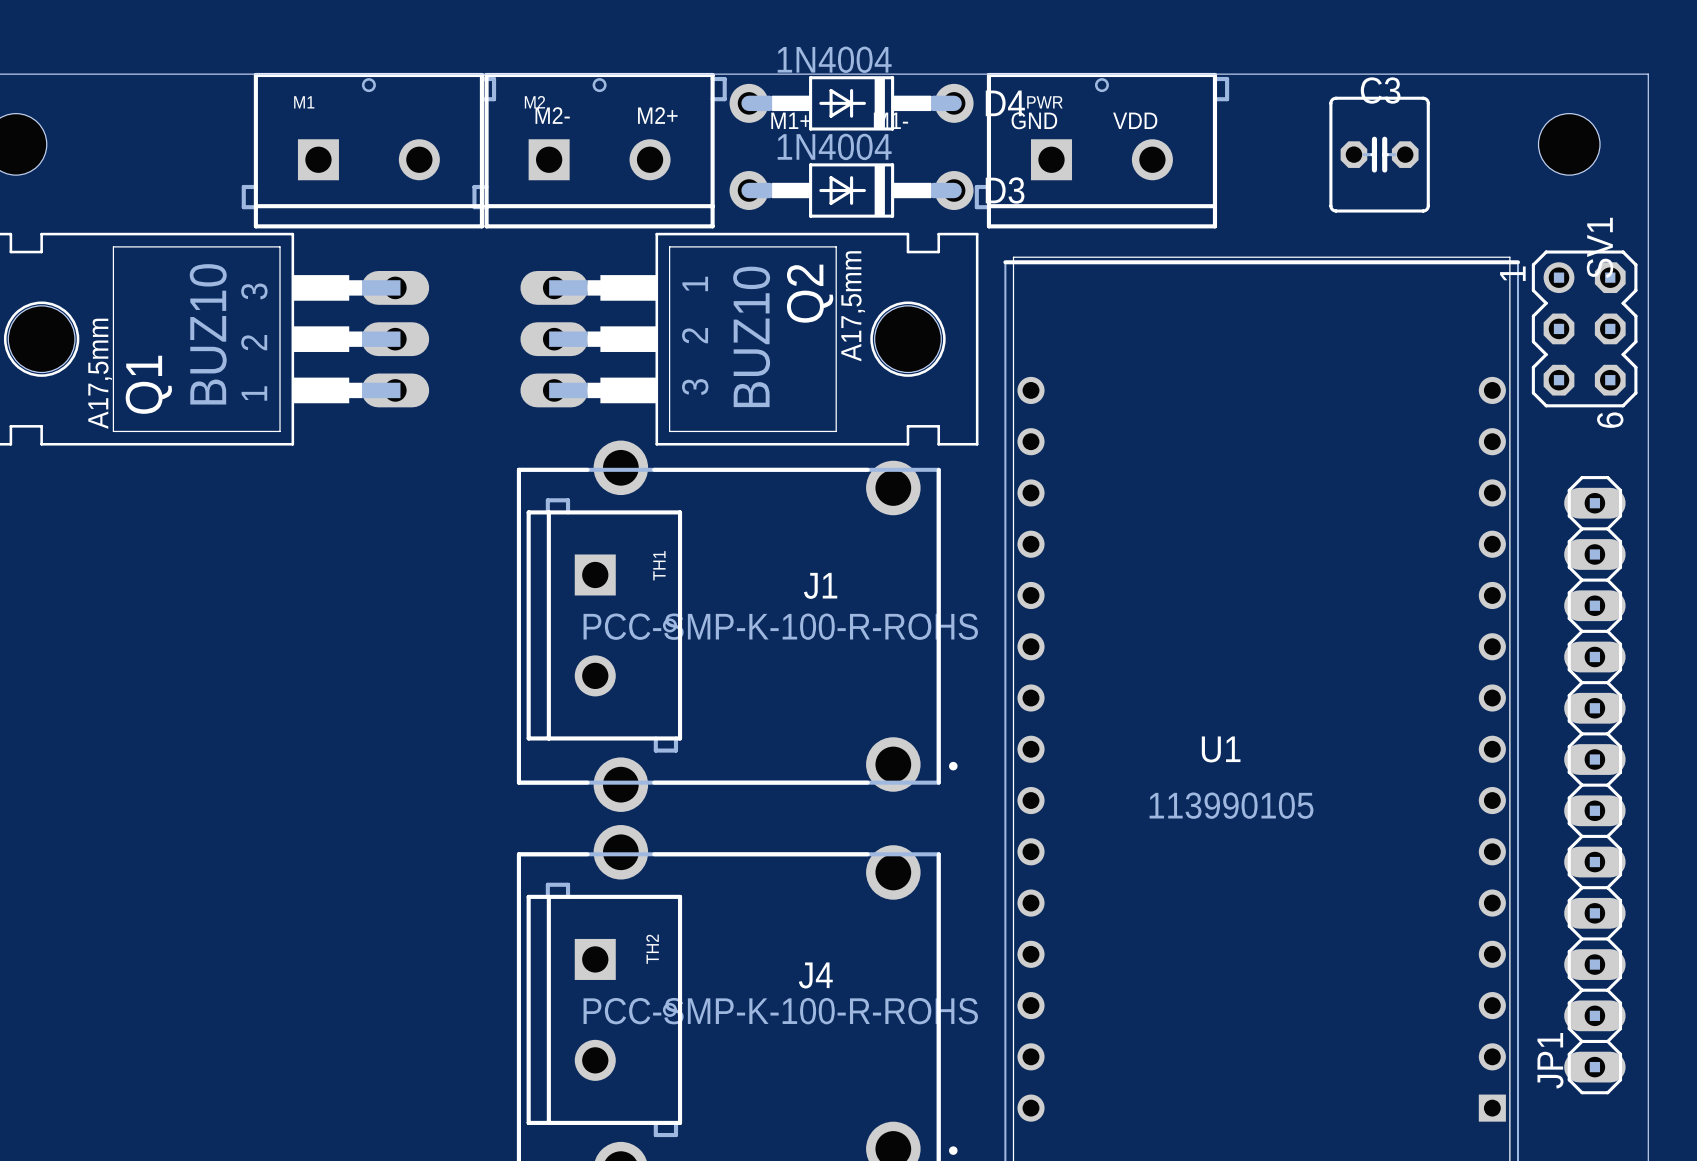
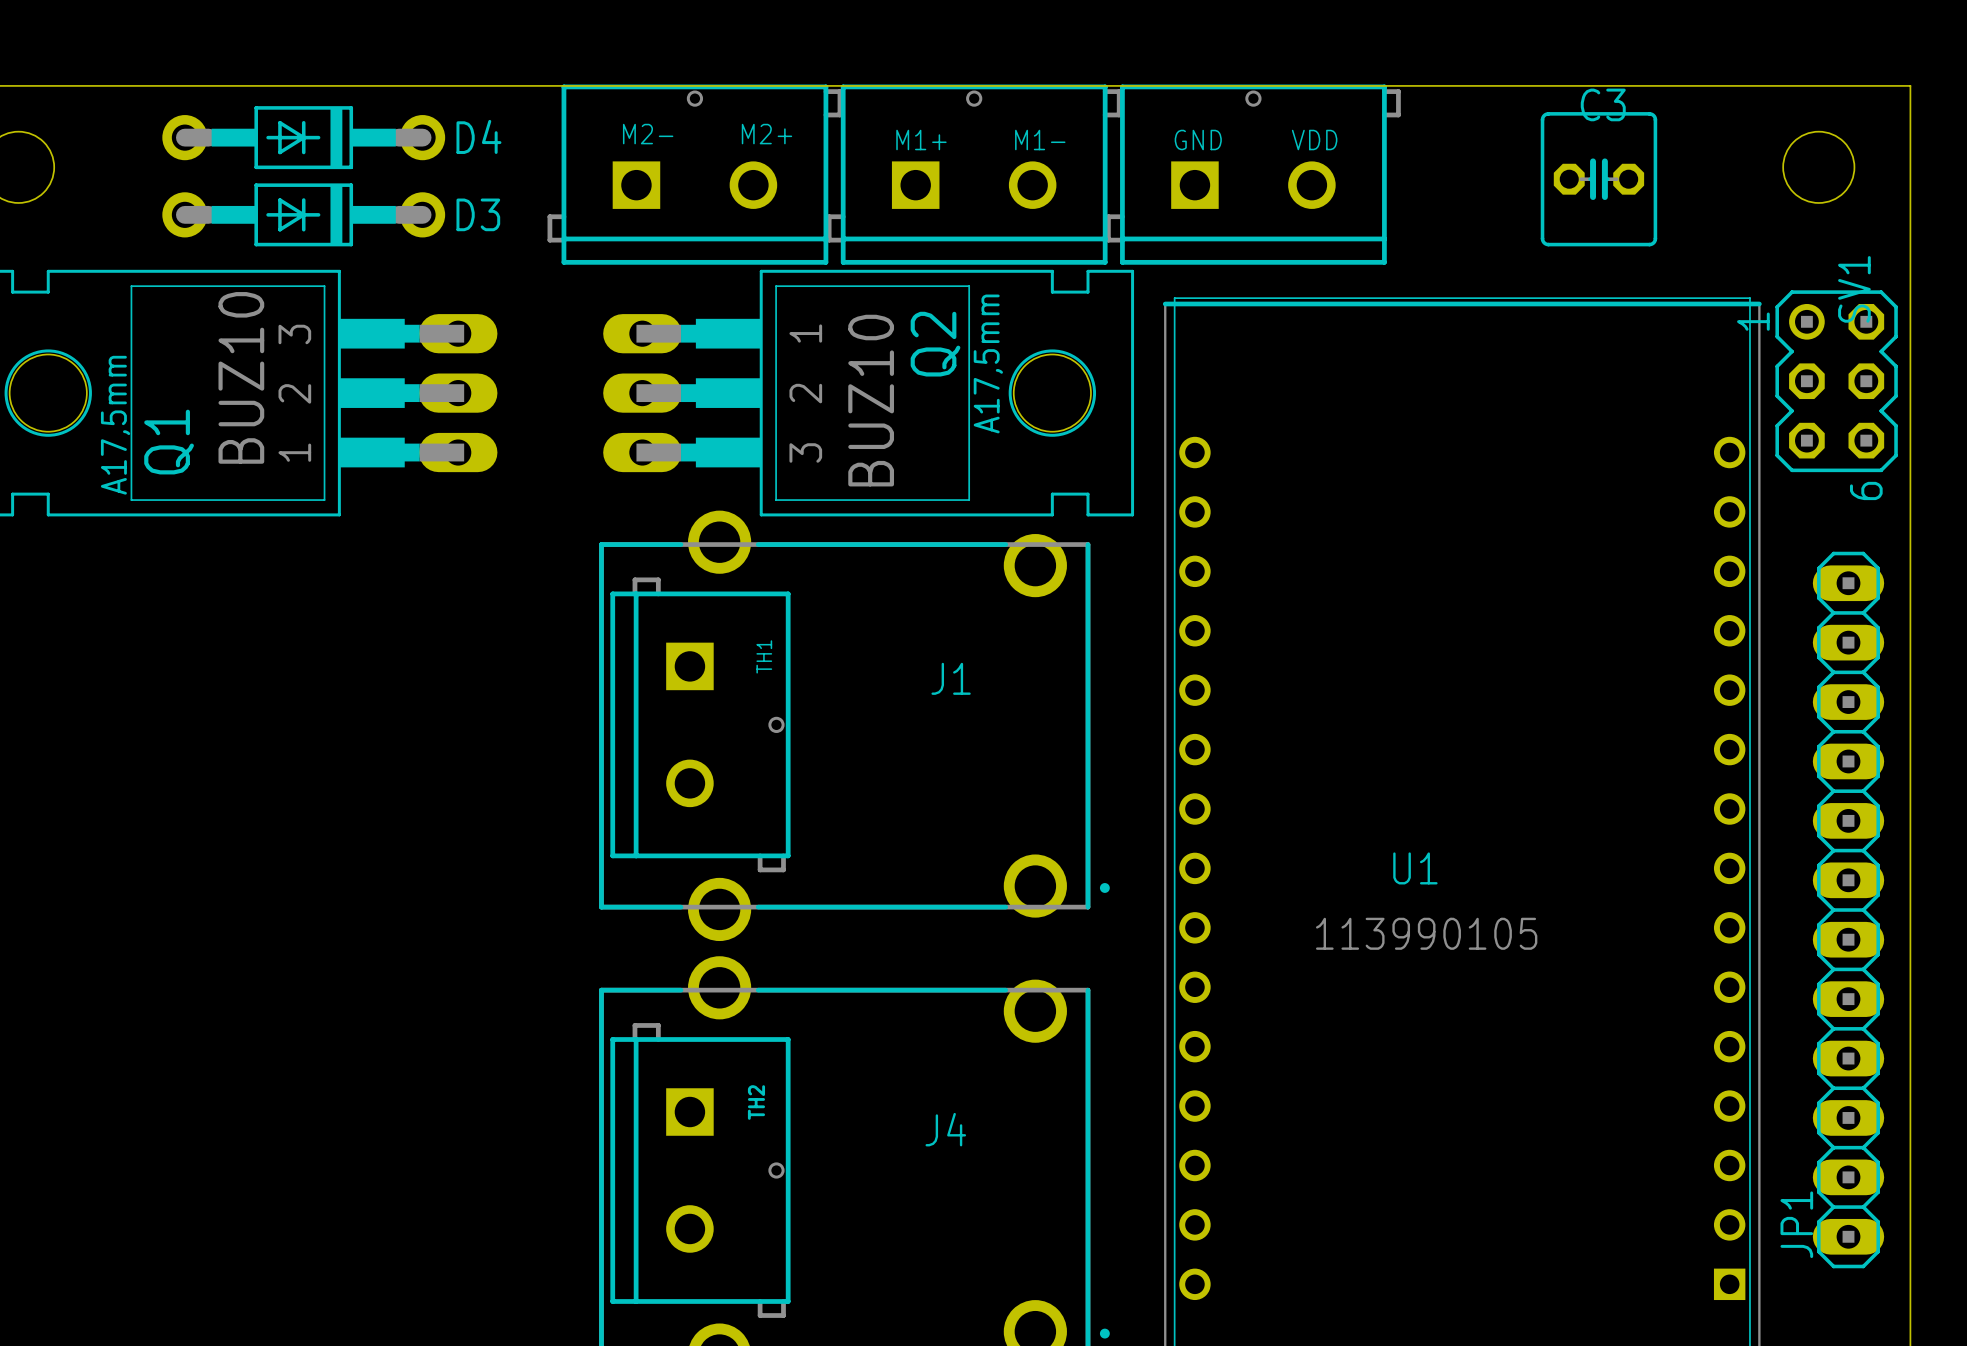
D4 value: 1N4004 (834, 59) -> none
M2 name: M2 (534, 102) -> none
D4 position: (851, 103) -> (303, 137)
D3 value: 1N4004 (834, 146) -> none
M1: (368, 150) -> none
part: none -> (974, 174)
part: none -> (1253, 174)
PWR: (1101, 150) -> none
D3 position: (851, 190) -> (303, 214)
J1 value: PCC-SMP-K-100-R-ROHS (780, 626) -> none
J4 value: PCC-SMP-K-100-R-ROHS (780, 1011) -> none

